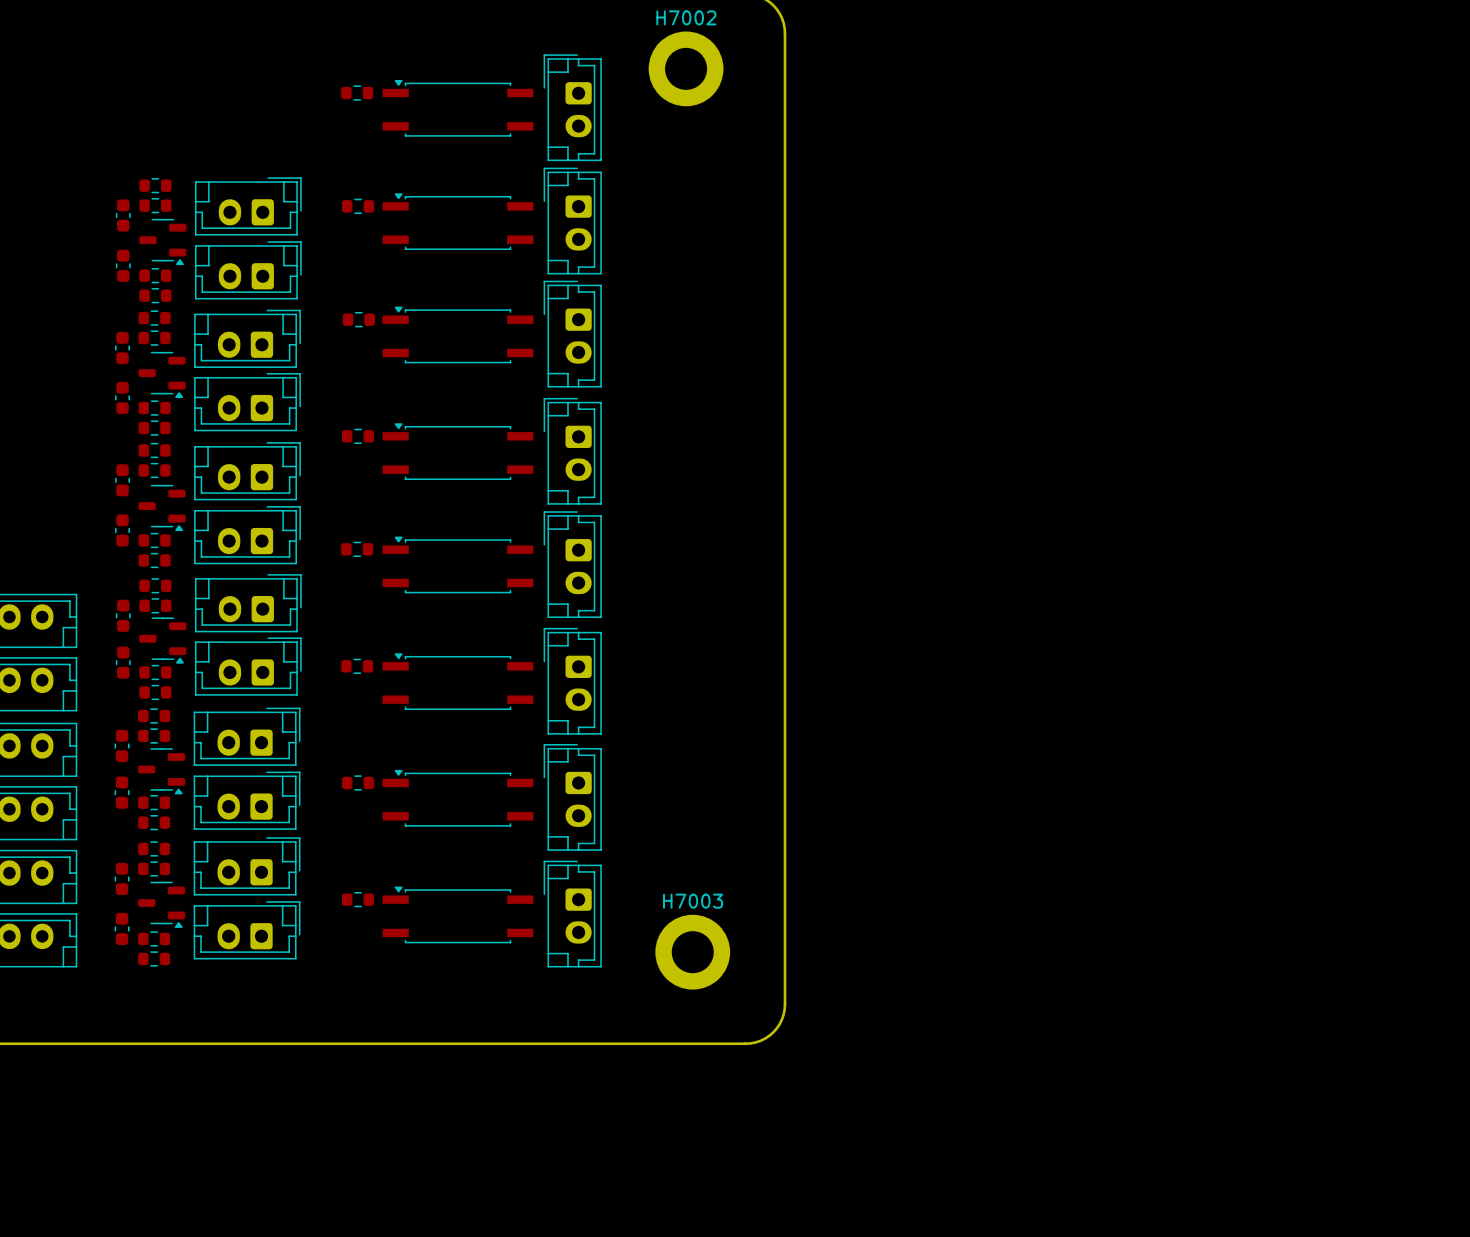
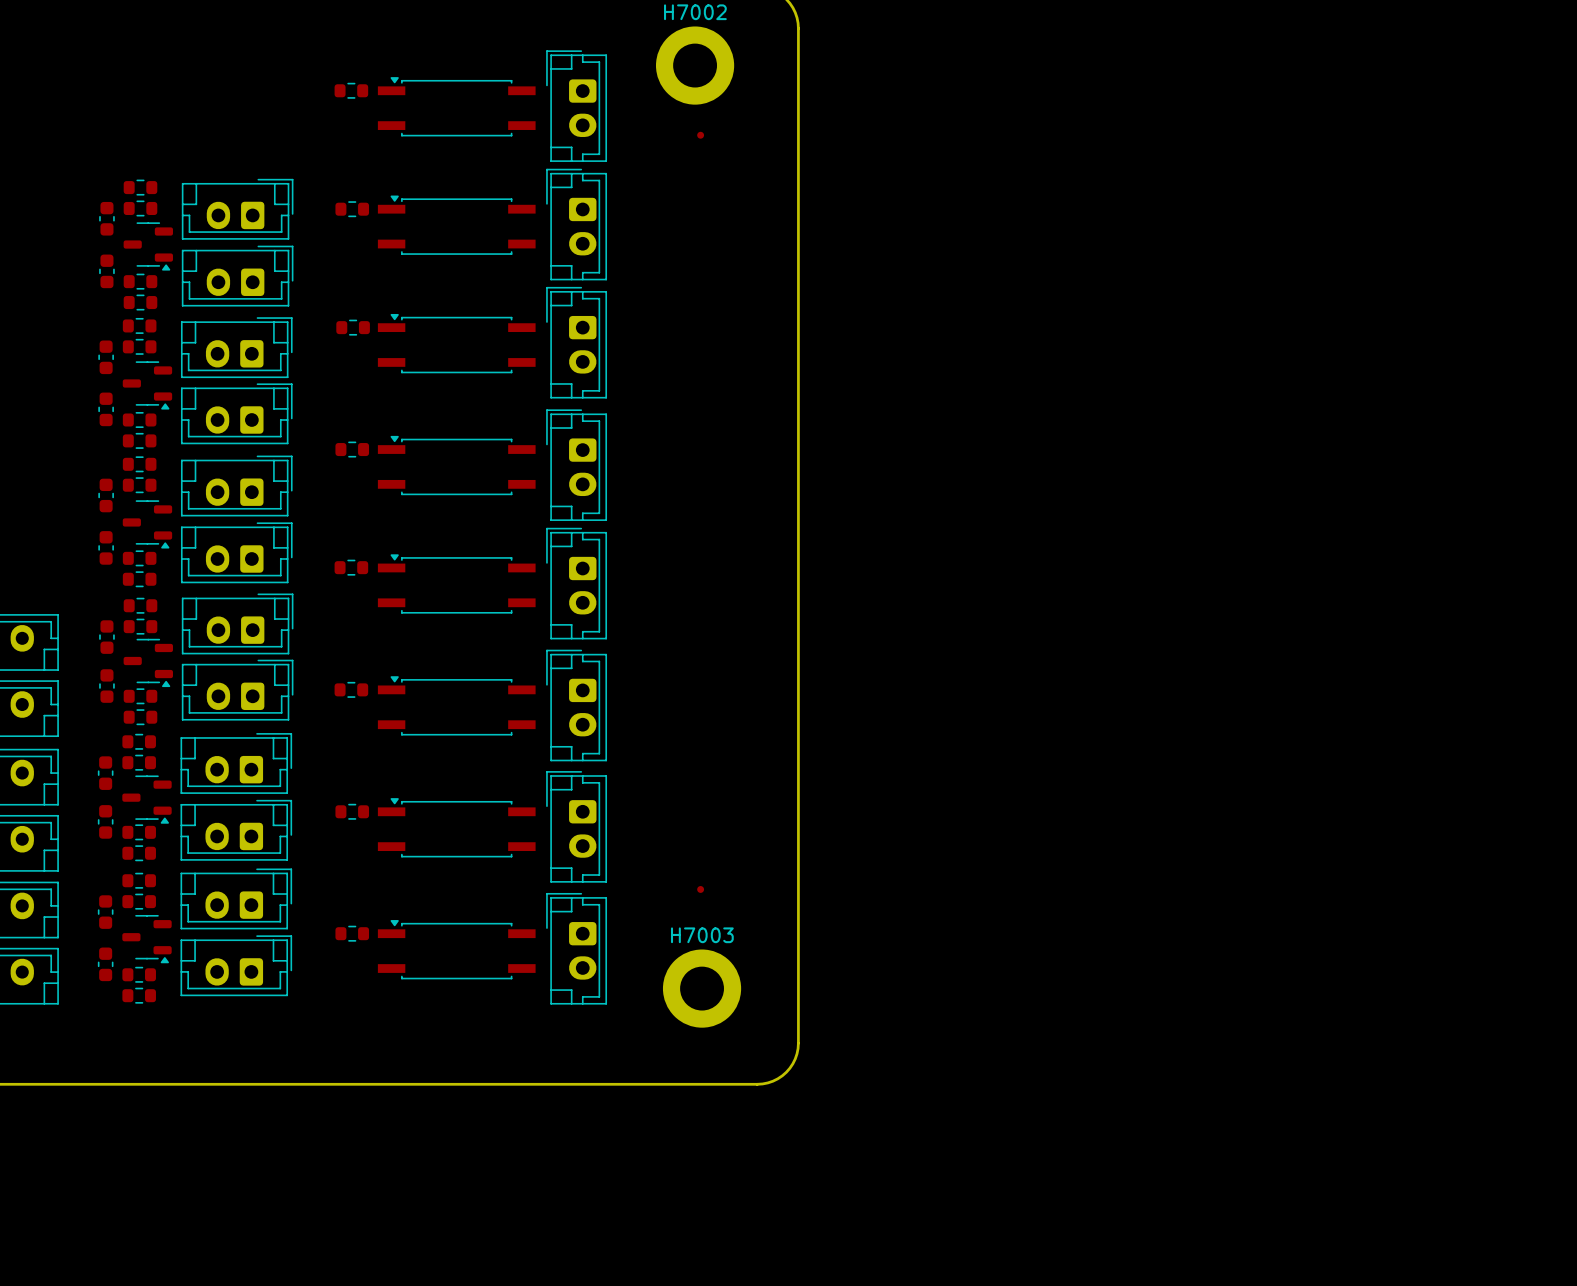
part: none -> (700, 135)
part: none -> (700, 889)

